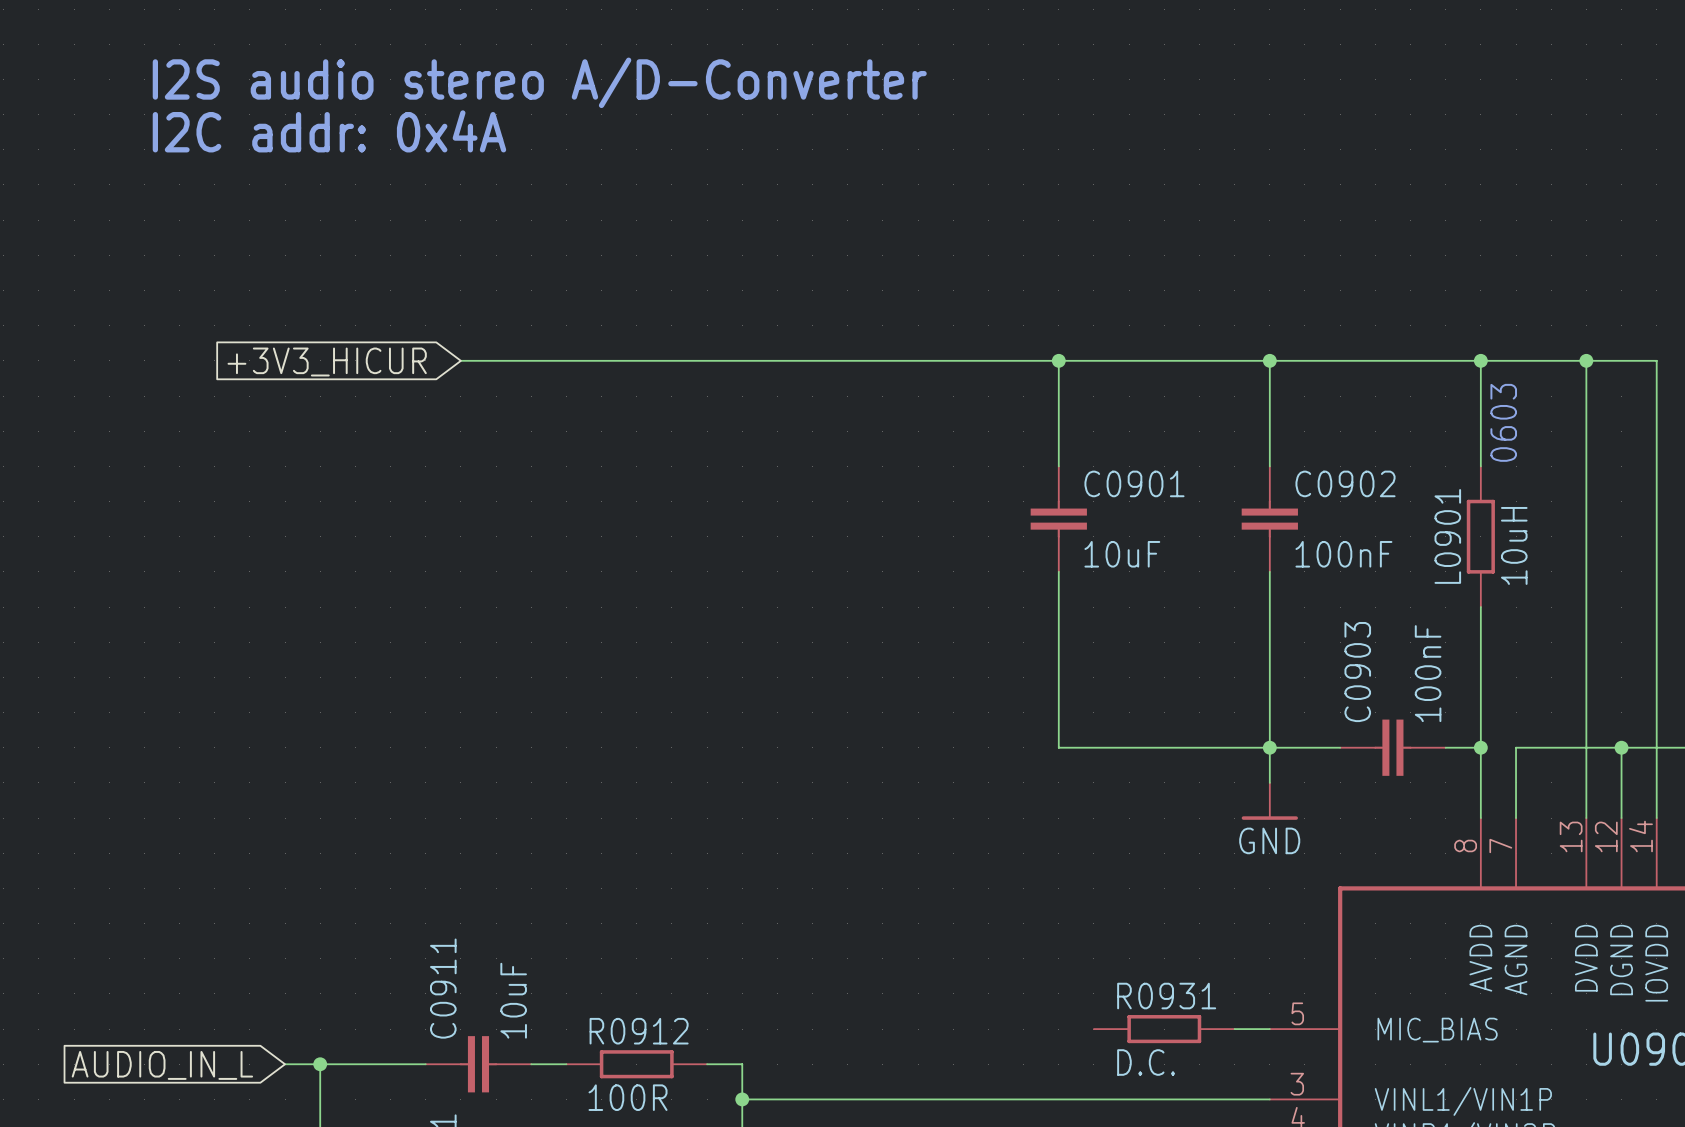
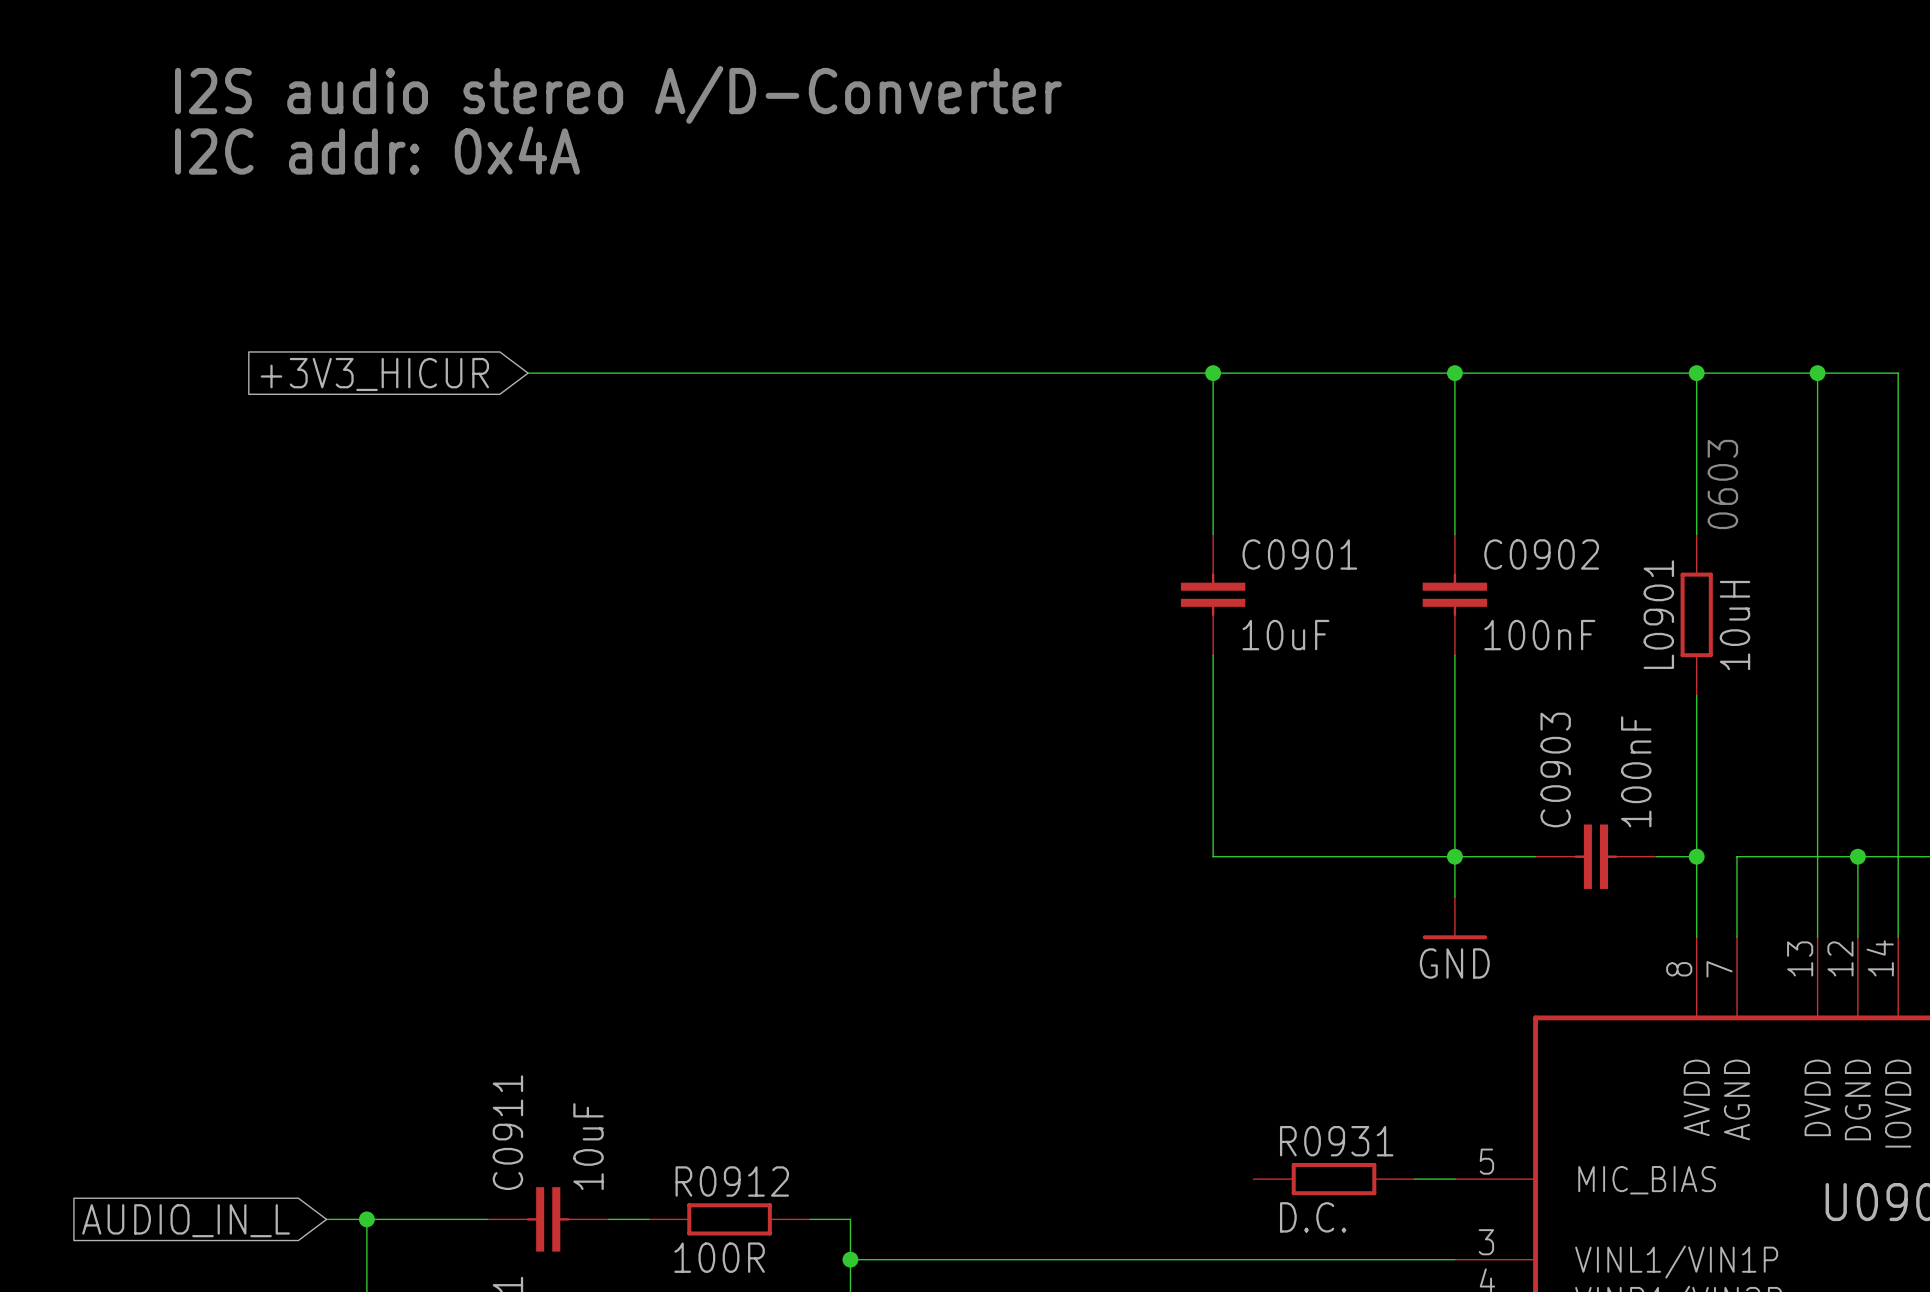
wire: none -> (1213, 373) (1213, 413)
wire: none -> (1454, 373) (1454, 413)
wire: none -> (1696, 373) (1696, 413)
wire: none -> (1817, 373) (1817, 413)
wire: (460, 360) (1656, 360) -> (528, 373) (1898, 373) (1898, 413)
junction position: (1058, 360) -> (1213, 373)
junction position: (1269, 360) -> (1454, 373)
junction position: (1480, 360) -> (1696, 373)
junction position: (1586, 360) -> (1817, 373)
global label position: +3V3_HICUR (327, 362) -> +3V3_HICUR (374, 374)

